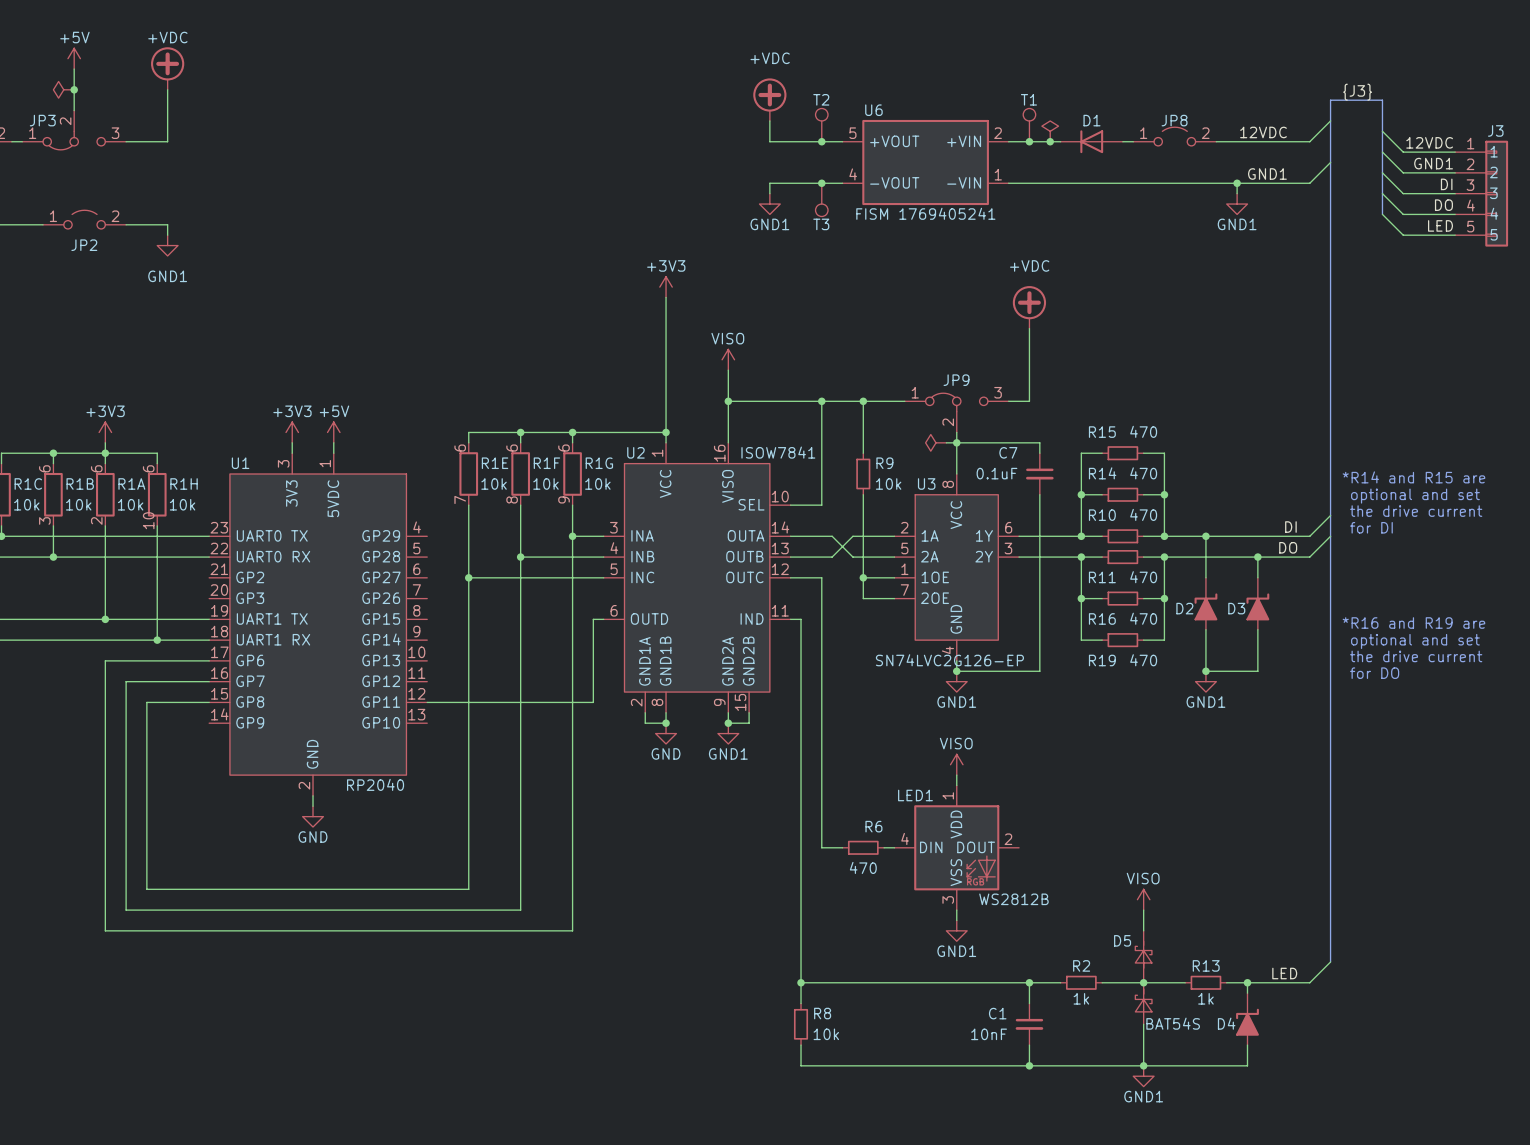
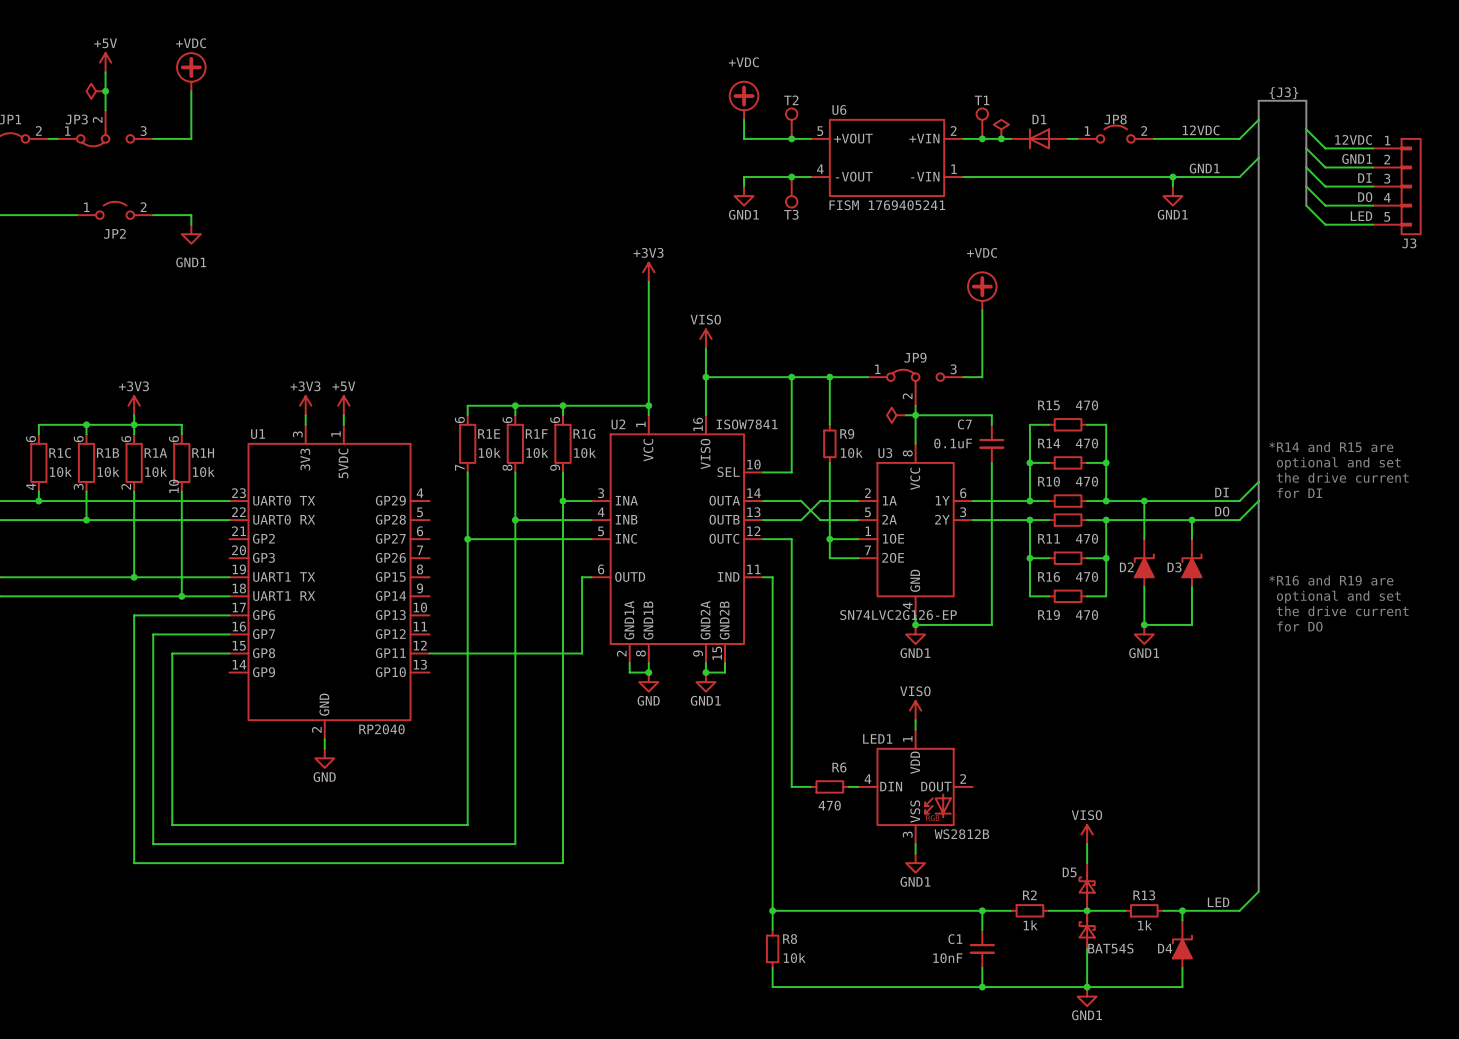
J3 name position: J3 (1495, 130) -> J3 (1409, 243)
J3 pin name: 1 (1494, 151) -> none
J3 pin name: 2 (1493, 172) -> none
J3 pin name: 3 (1493, 193) -> none
J3 pin name: 4 (1494, 213) -> none
J3 pin name: 5 (1494, 234) -> none

